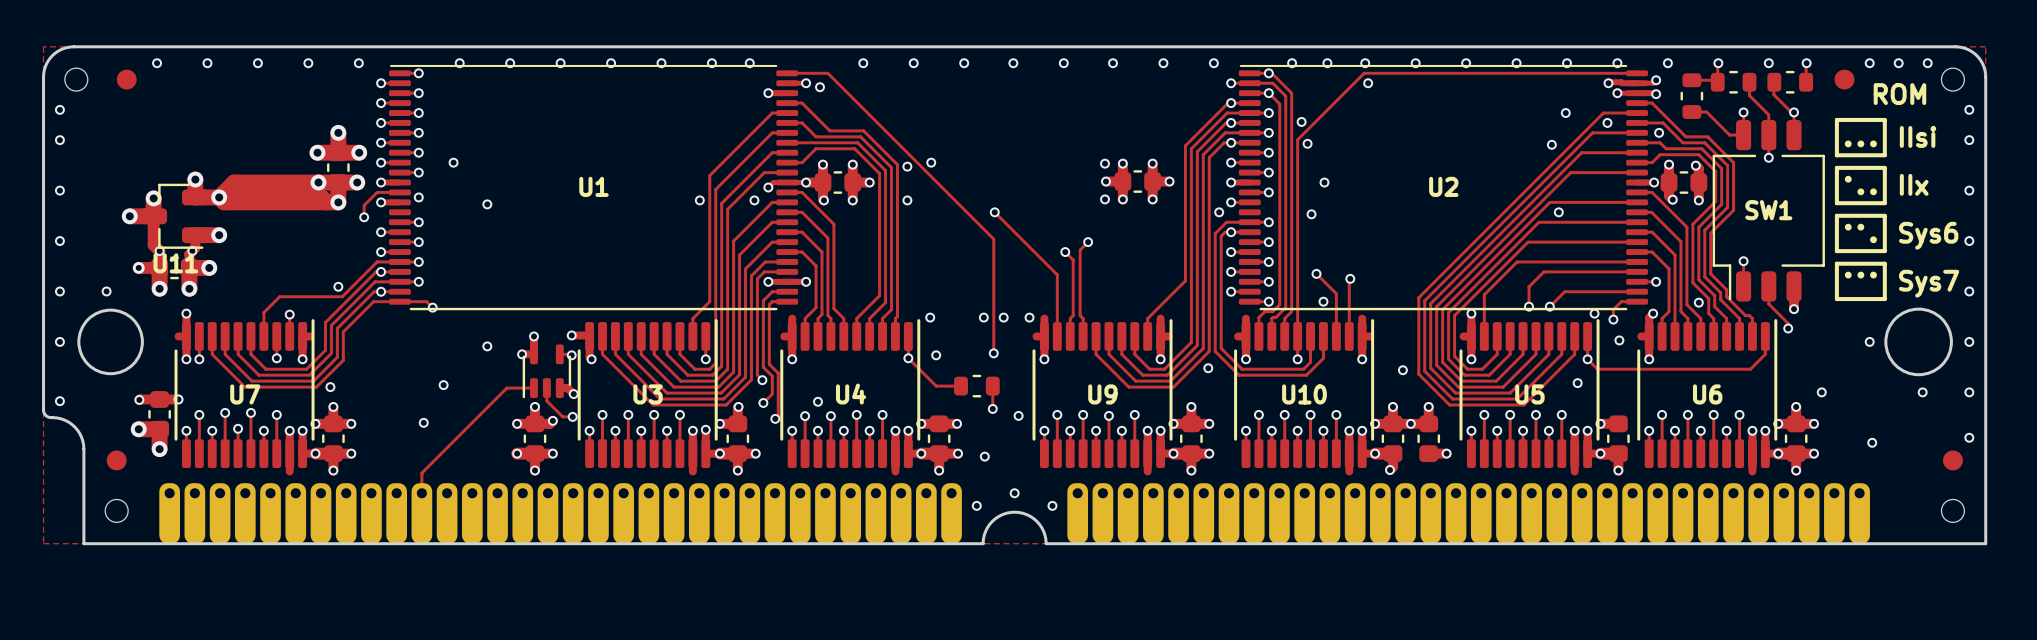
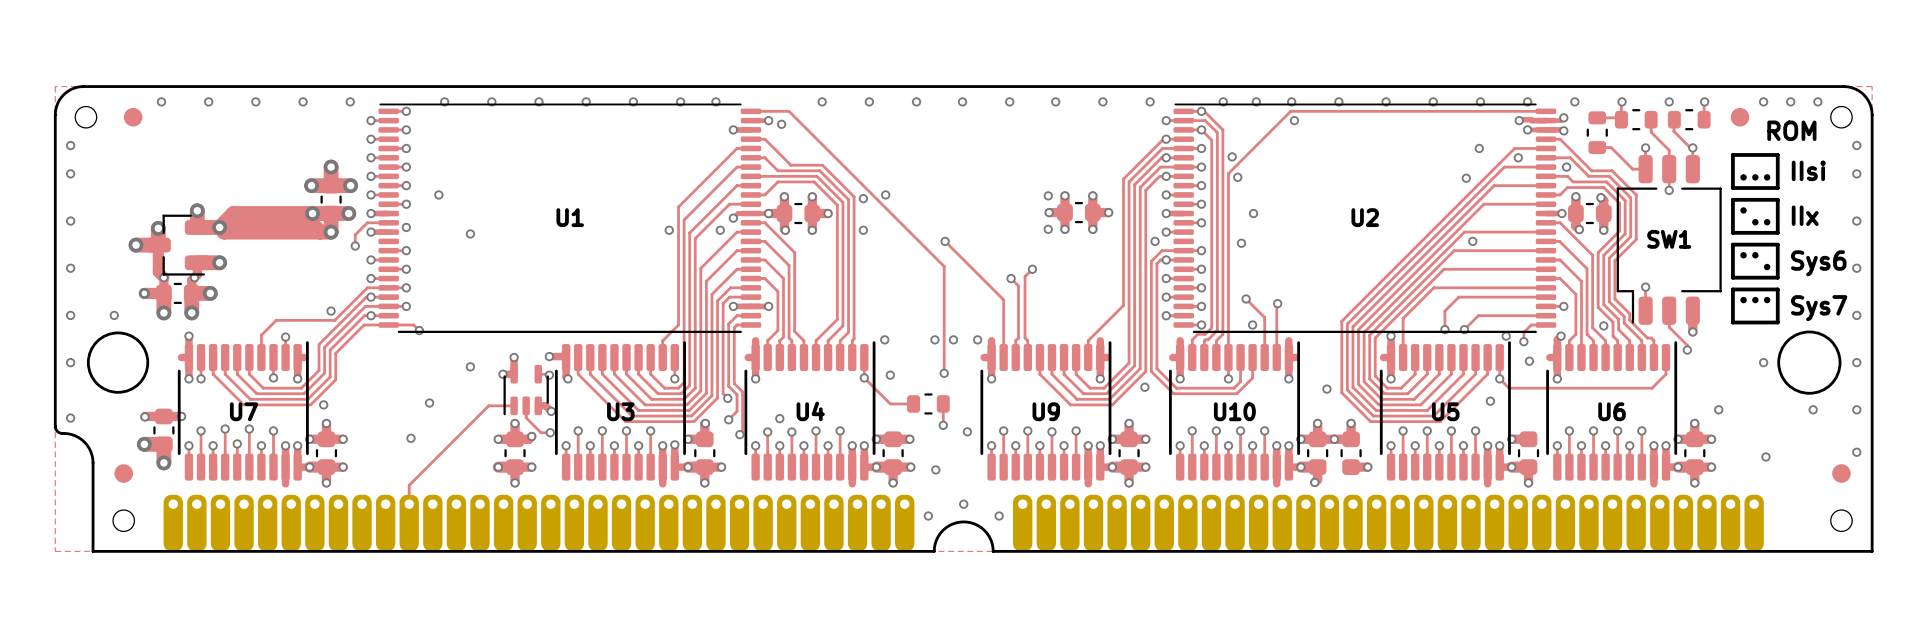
U11 name: U11 (175, 263) -> none

